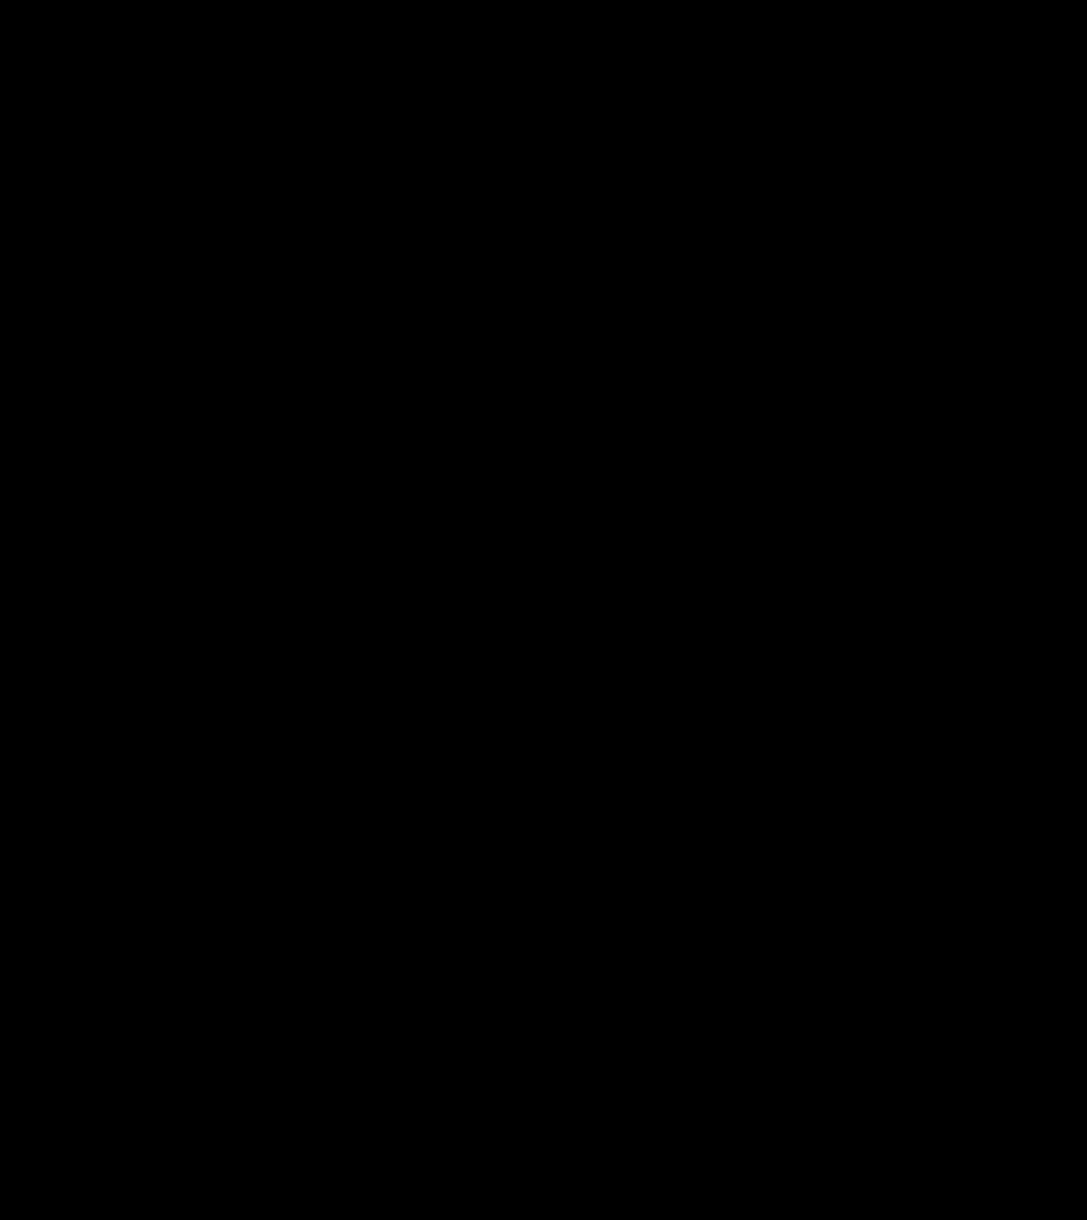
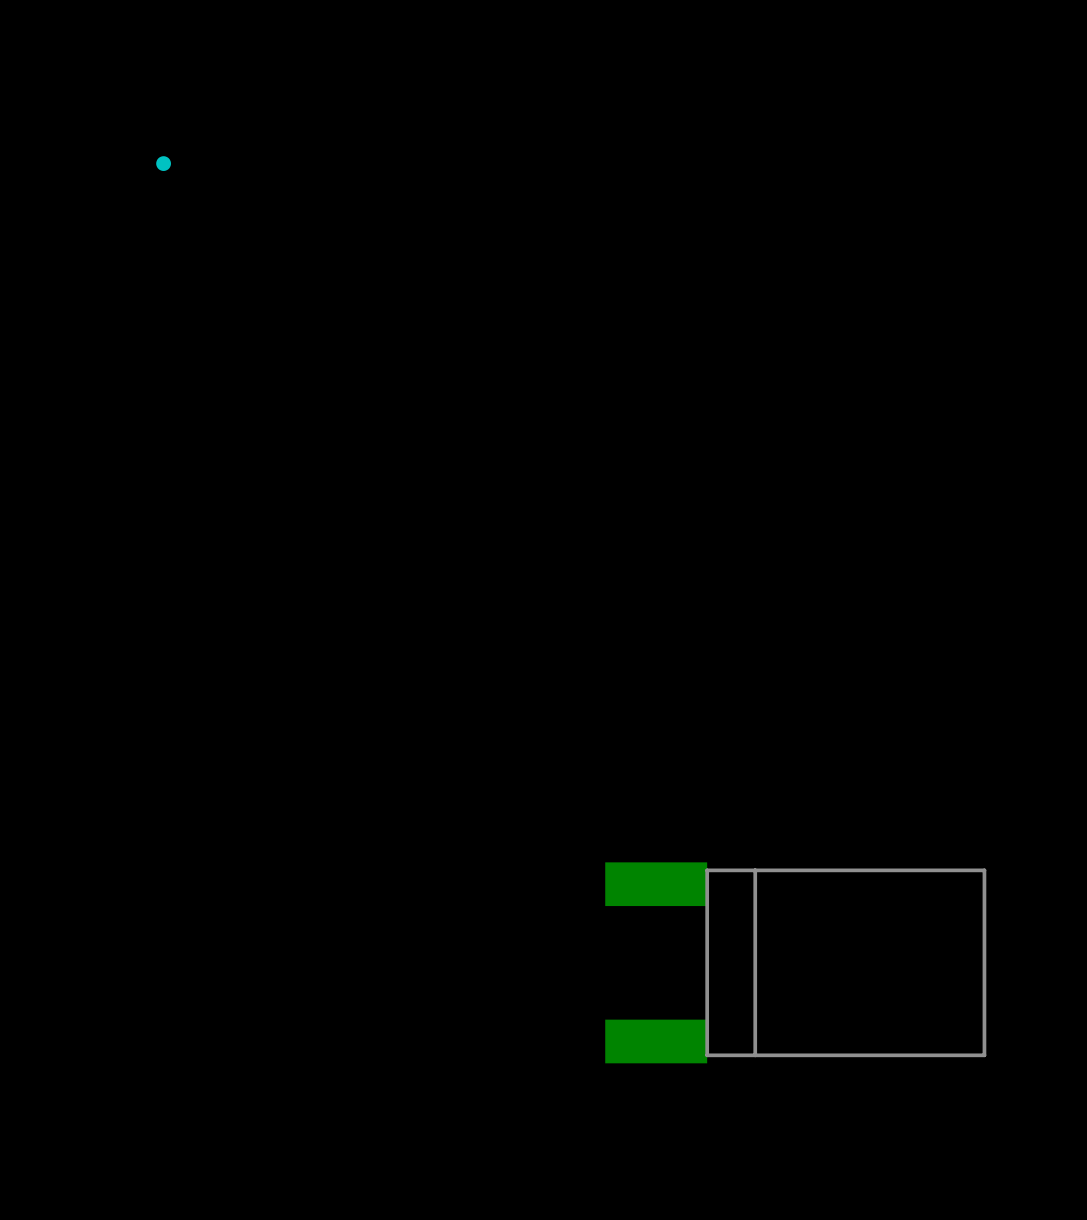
part: none -> (163, 163)
part: none -> (795, 962)

